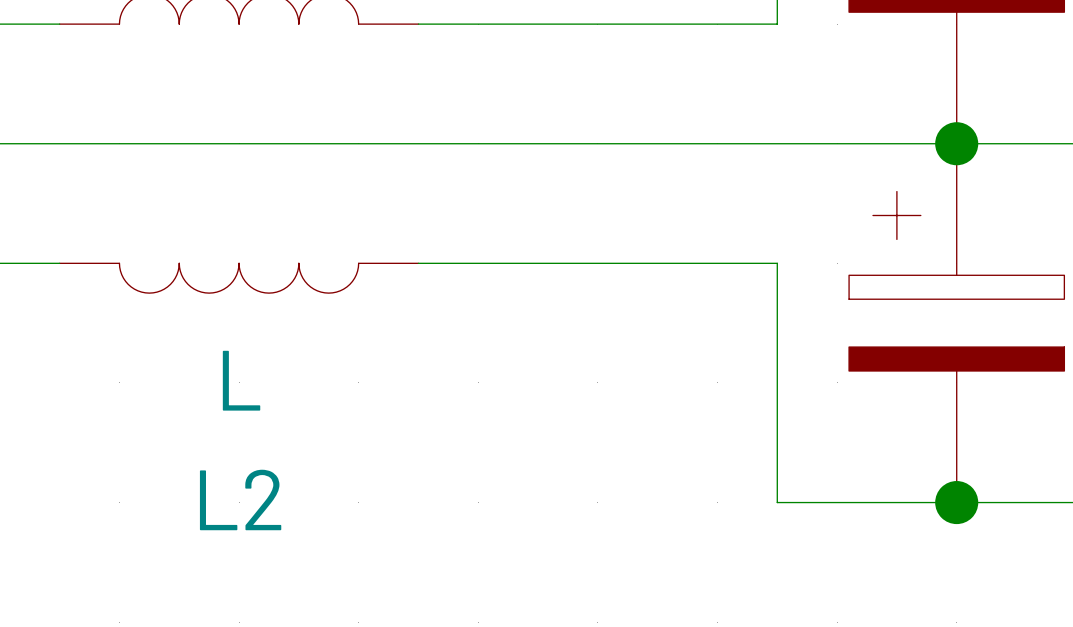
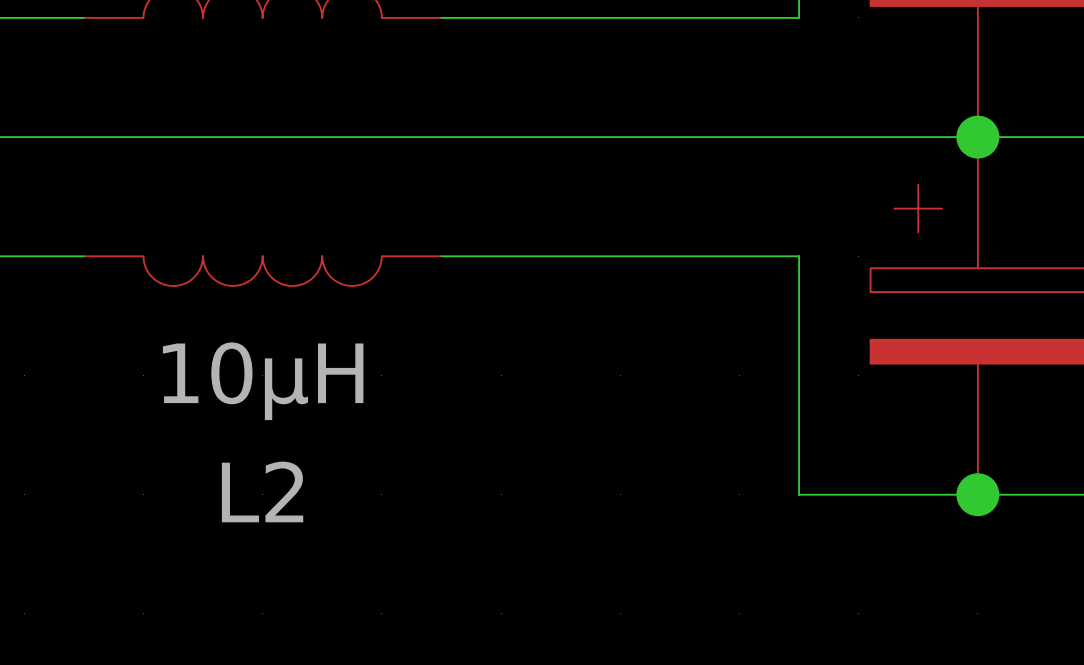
L2 value: L (241, 380) -> 10µH (263, 381)

